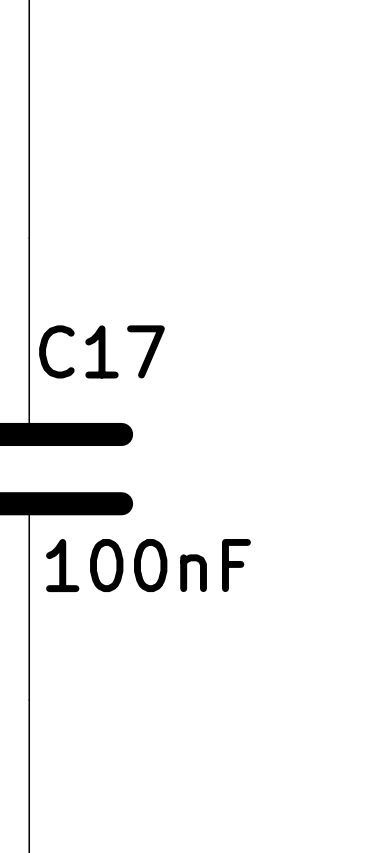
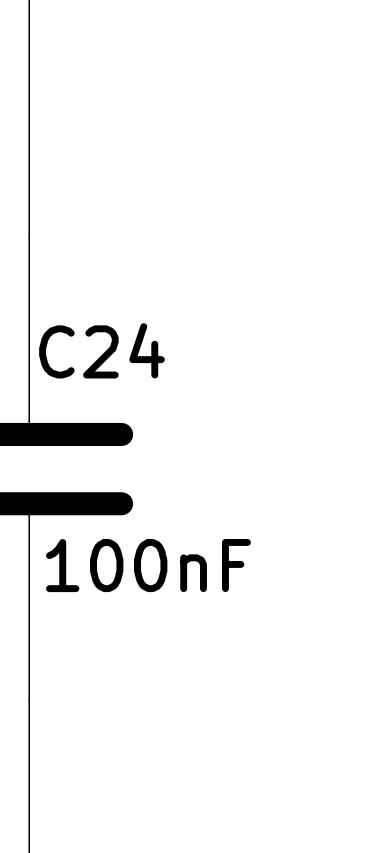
C17 name: C17 (101, 351) -> C24 (101, 350)

